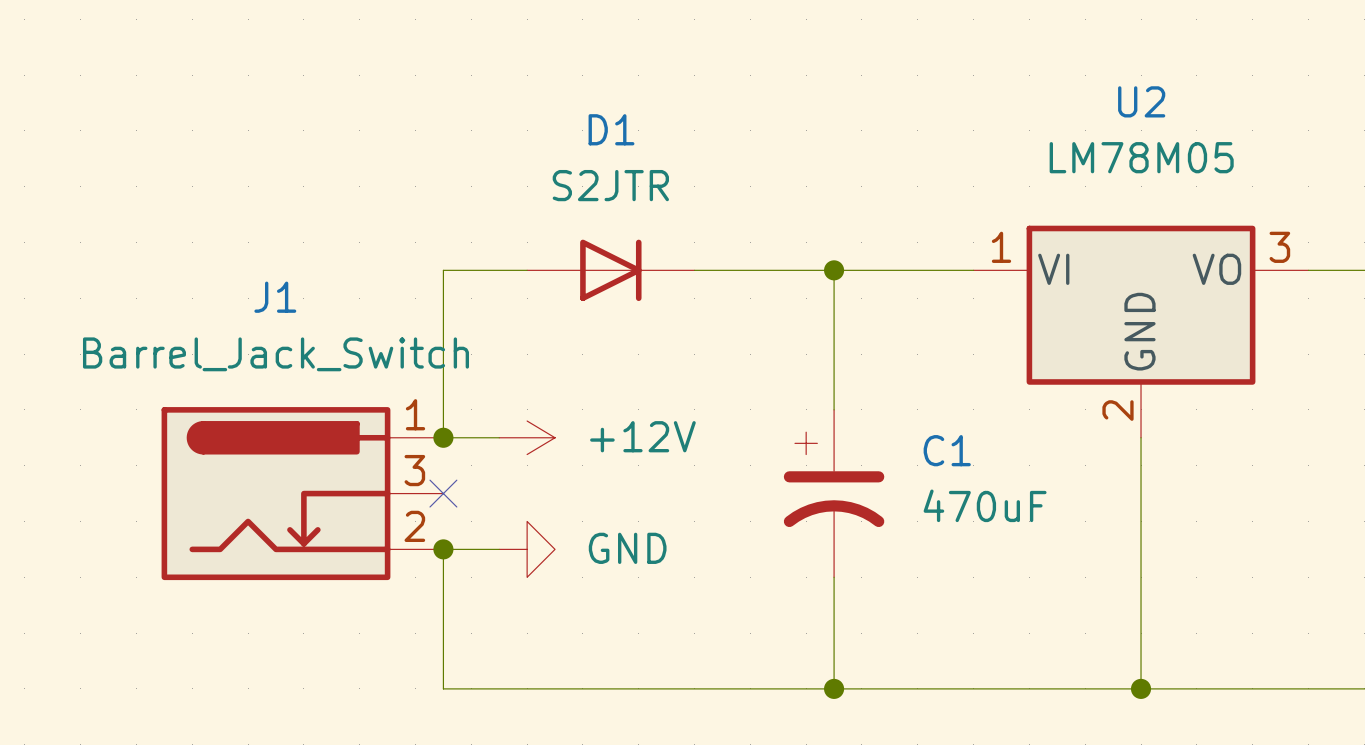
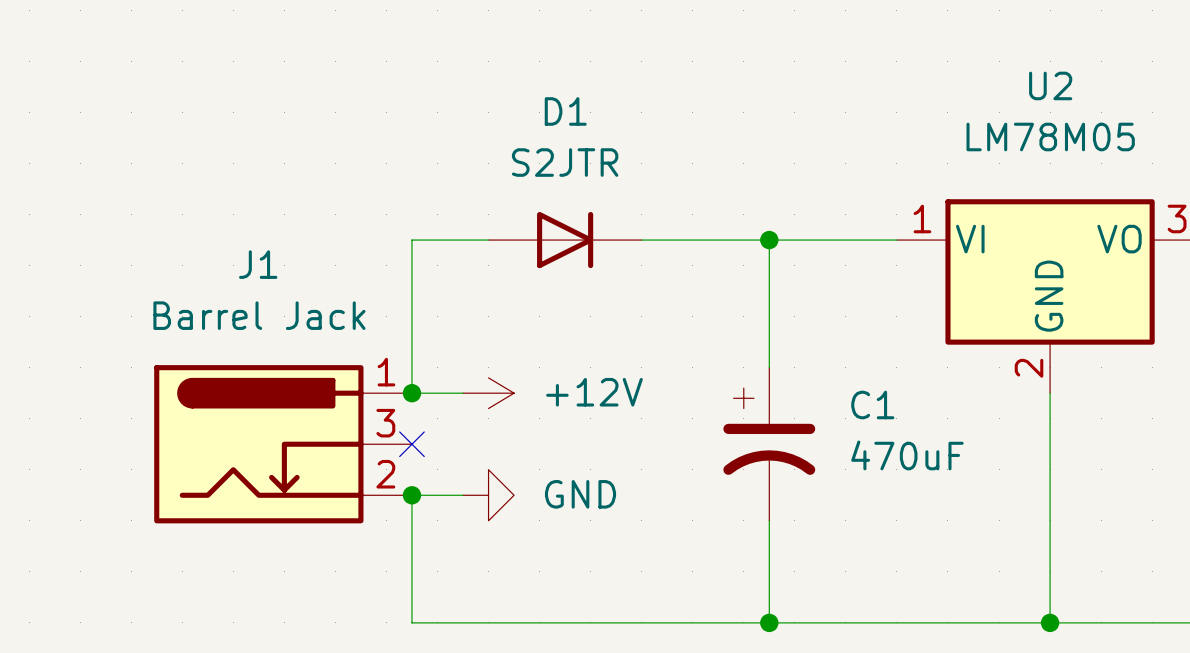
J1 value: Barrel_Jack_Switch (275, 354) -> Barrel Jack (259, 315)

